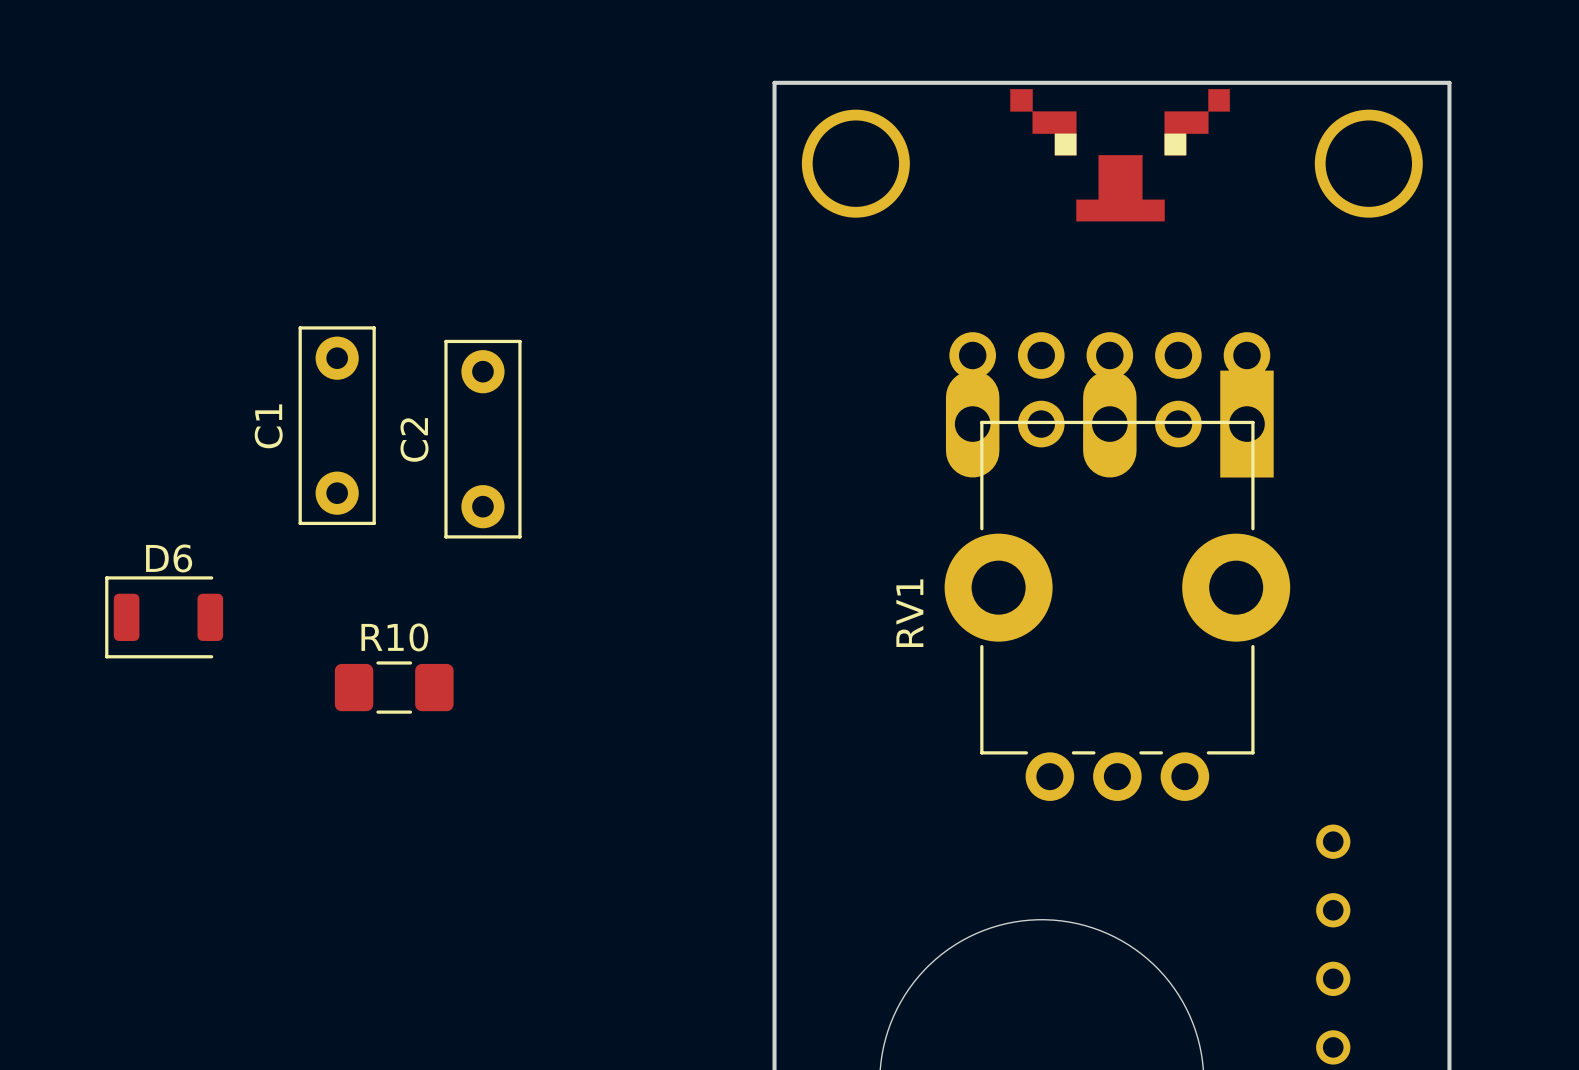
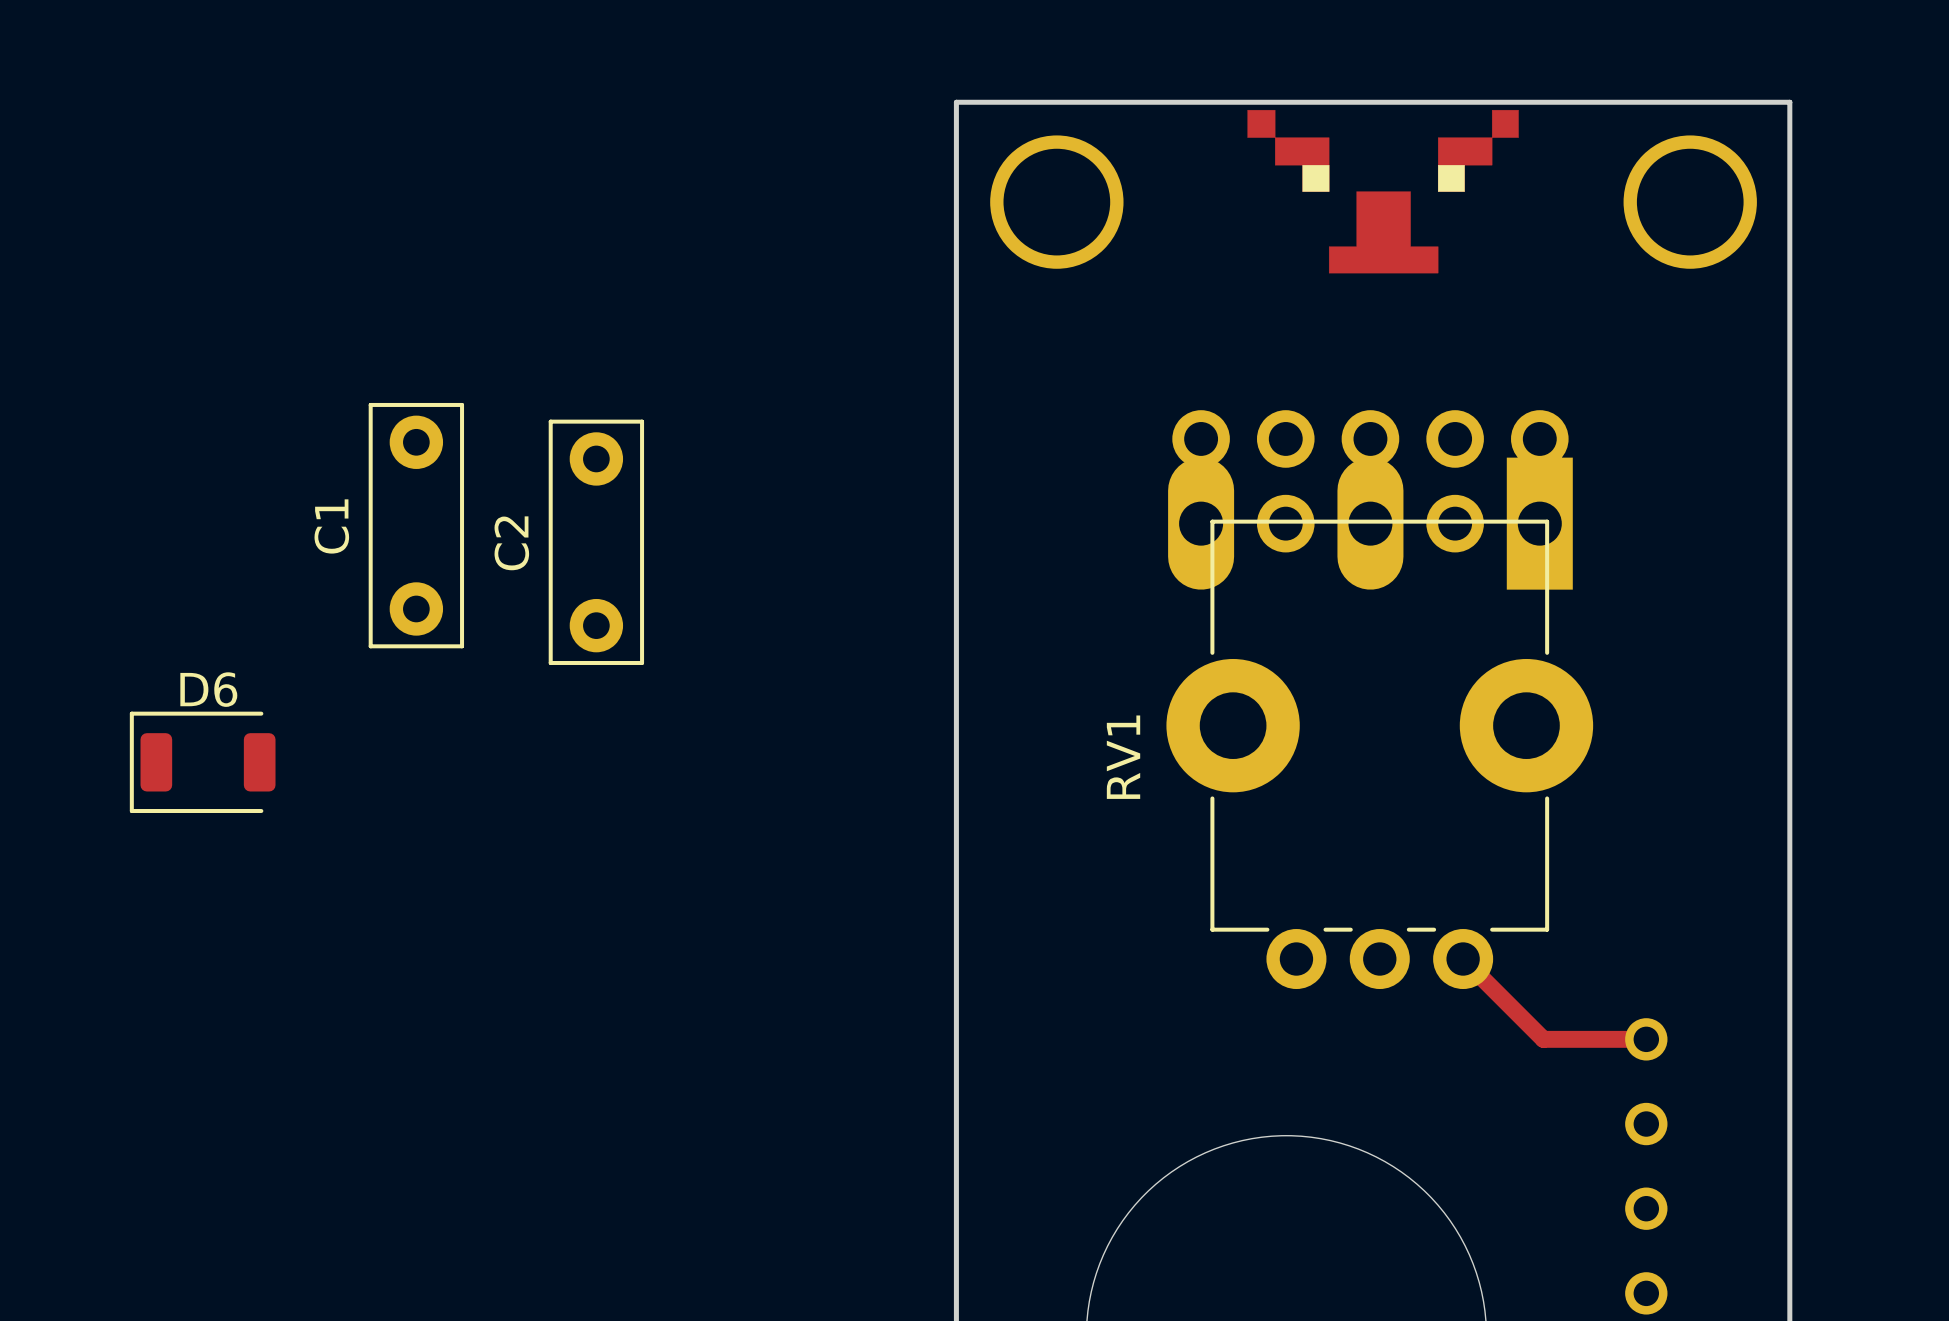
R10: (394, 687) -> none
track: none -> (1463, 959) (1543, 1039) (1646, 1039)

